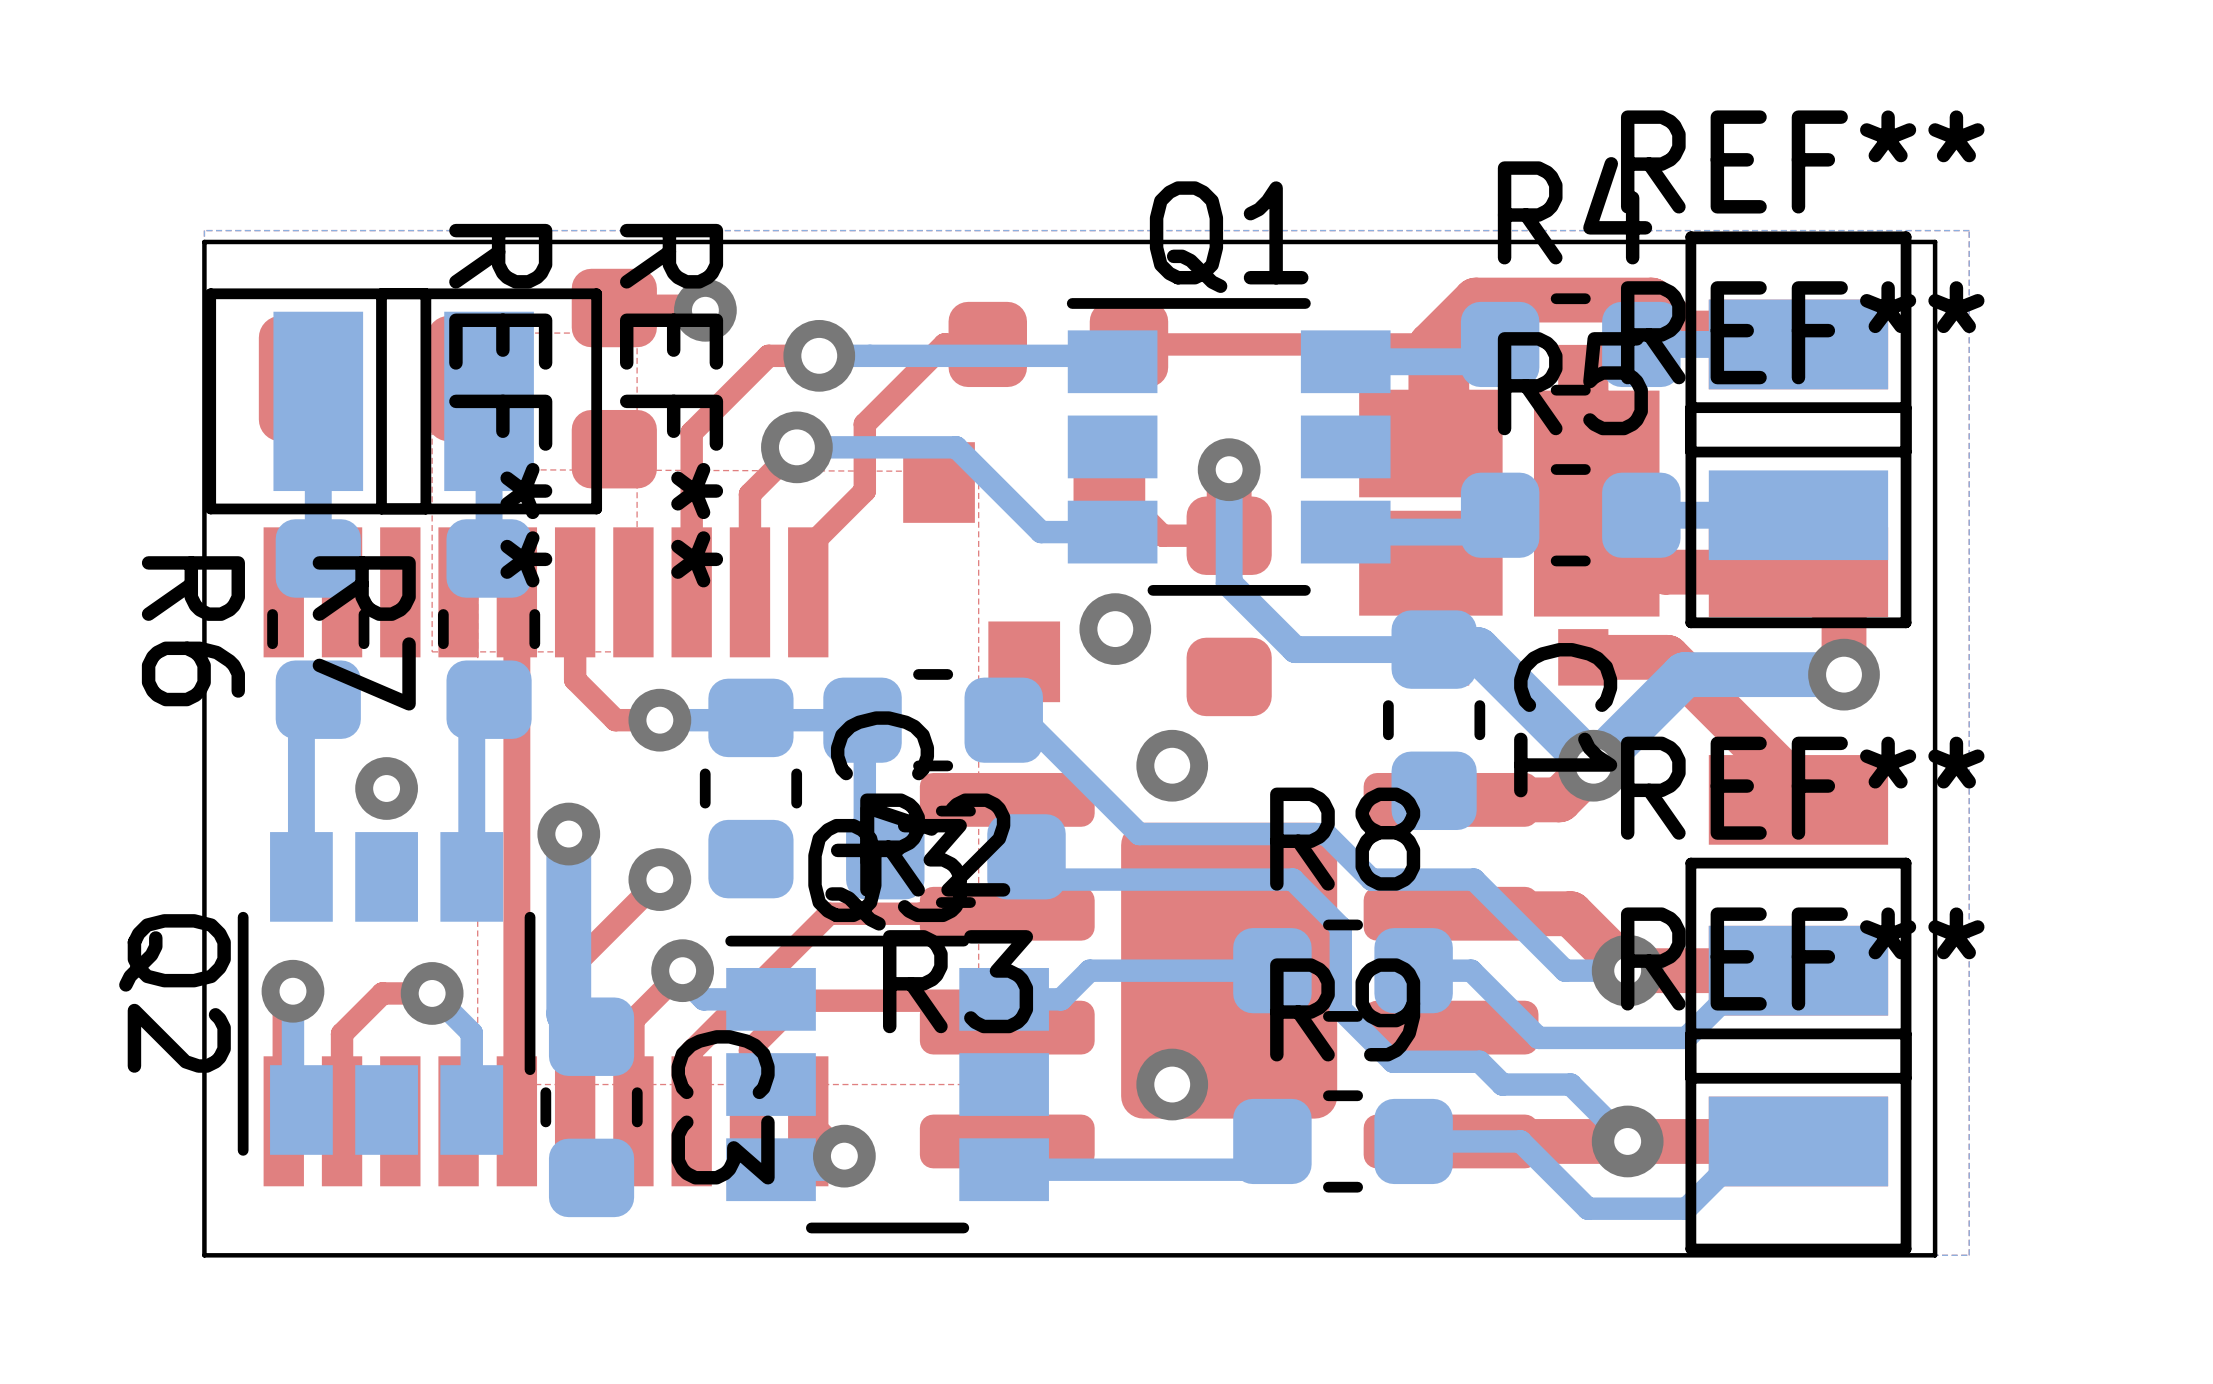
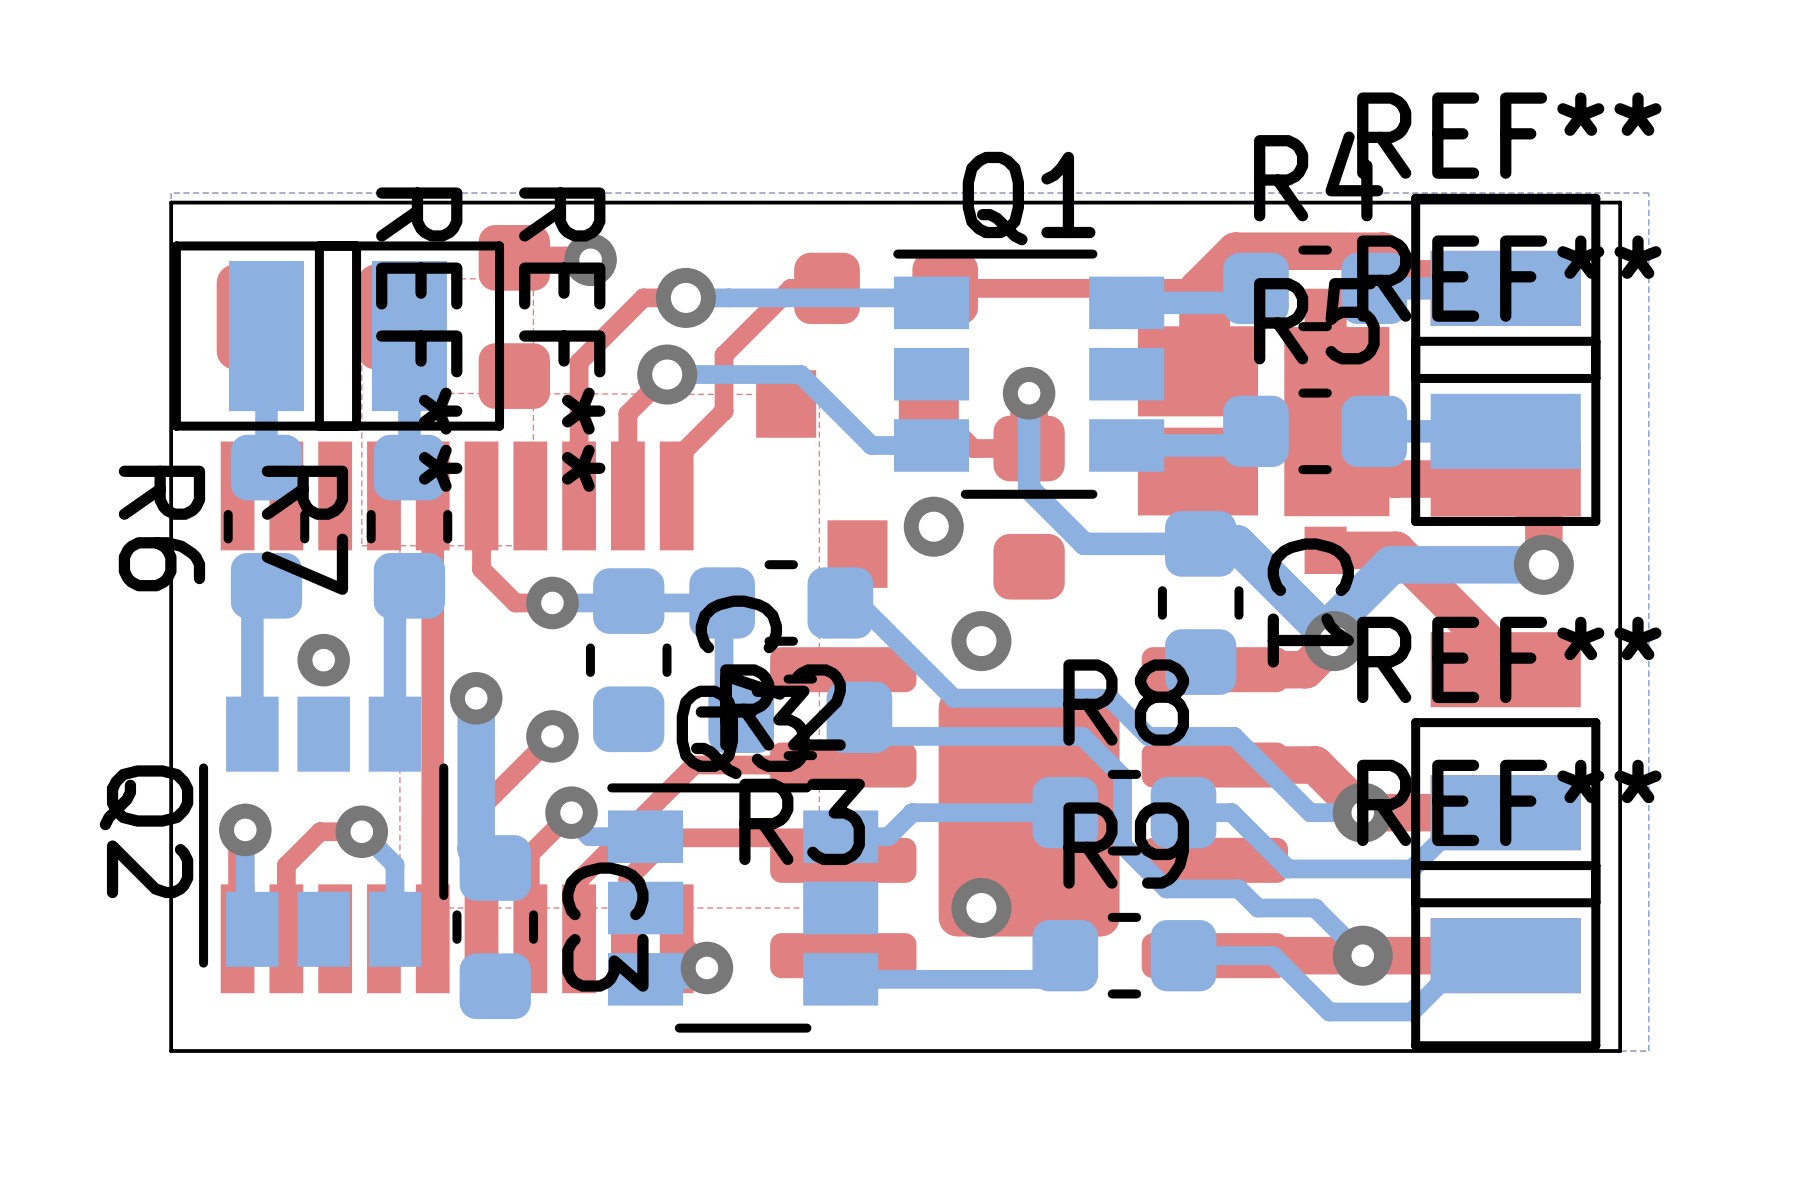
bottom track: (1684, 674) (1593, 765) -> (1410, 564) (1391, 564) (1334, 622) (1334, 641)

